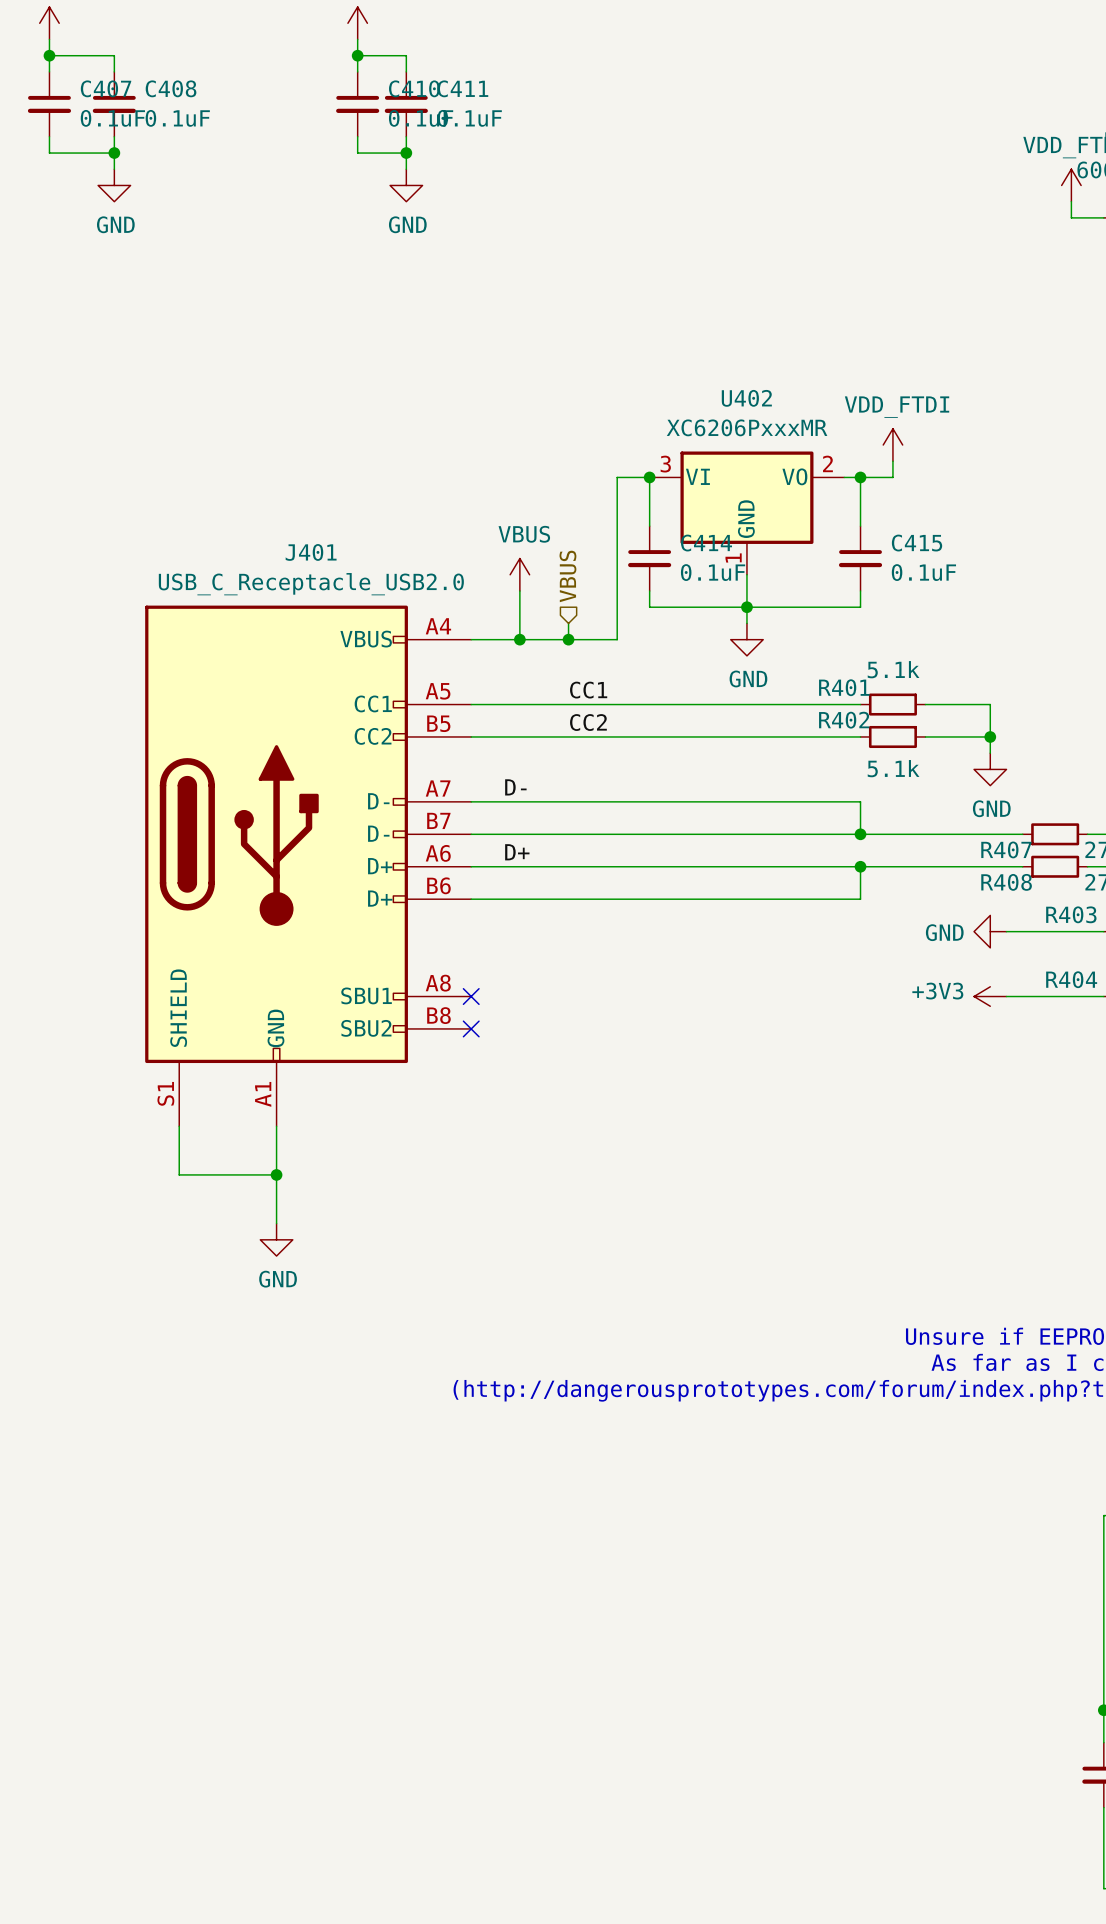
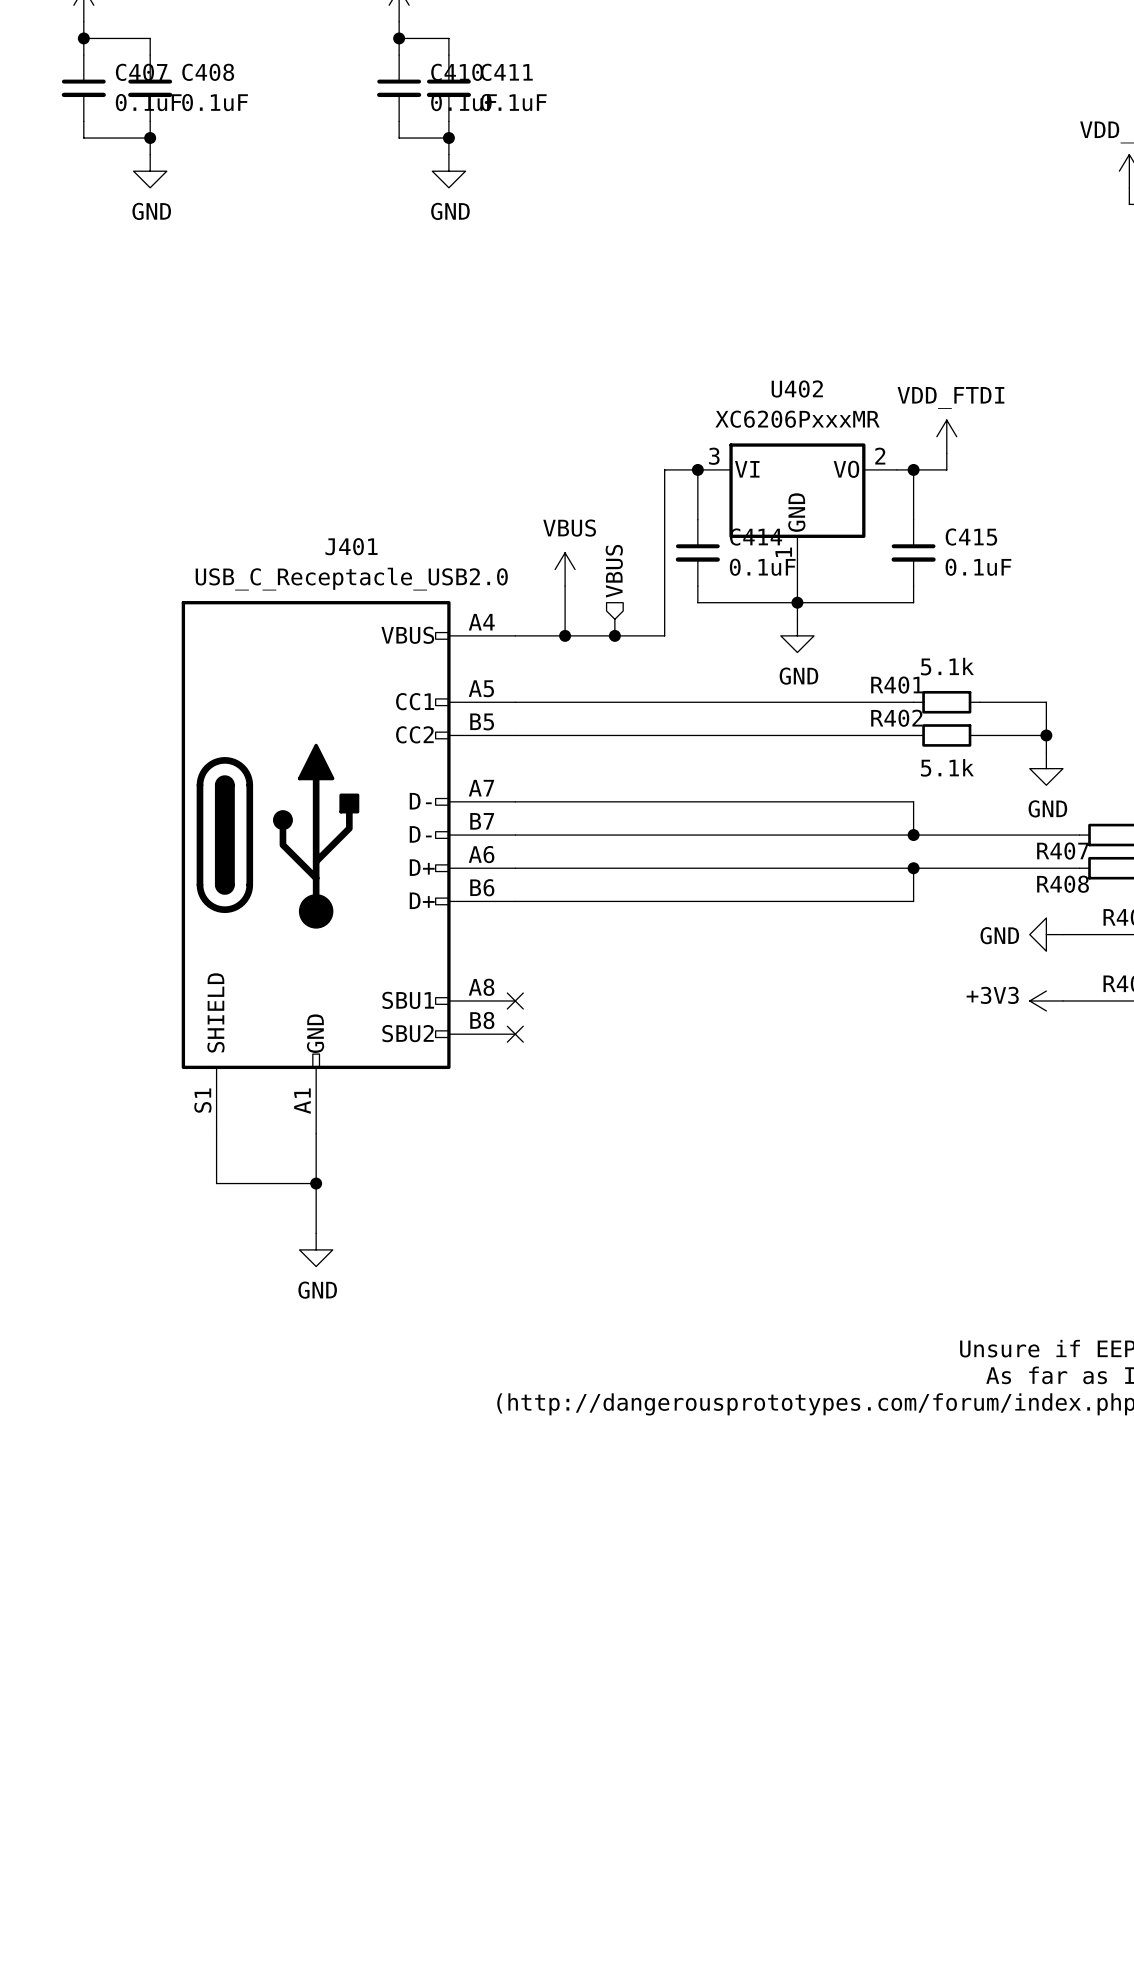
label: CC1 (588, 690) -> none
label: CC2 (588, 722) -> none
label: D- (515, 787) -> none
label: D+ (517, 852) -> none

